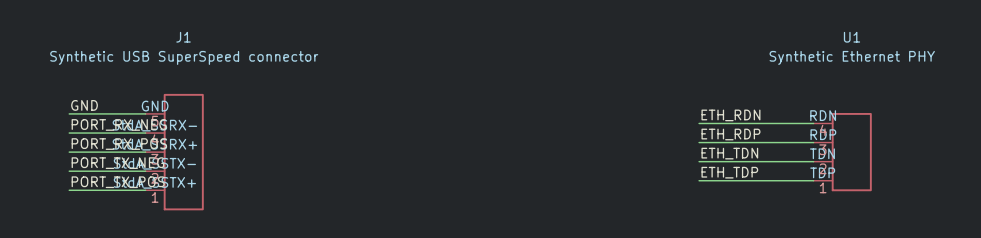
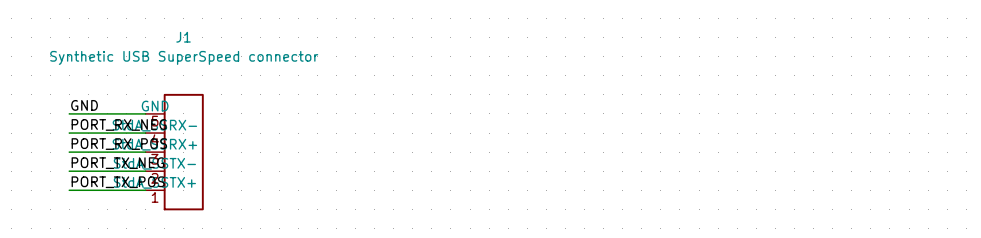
label: ETH_RDN (730, 115) -> none
wire: (699, 123) (813, 123) -> none
label: ETH_RDP (730, 134) -> none
wire: (699, 142) (813, 142) -> none
U1: Synthetic Ethernet PHY (842, 152) -> none
label: ETH_TDN (729, 153) -> none
wire: (699, 161) (813, 161) -> none
label: ETH_TDP (729, 172) -> none
wire: (699, 180) (813, 180) -> none

